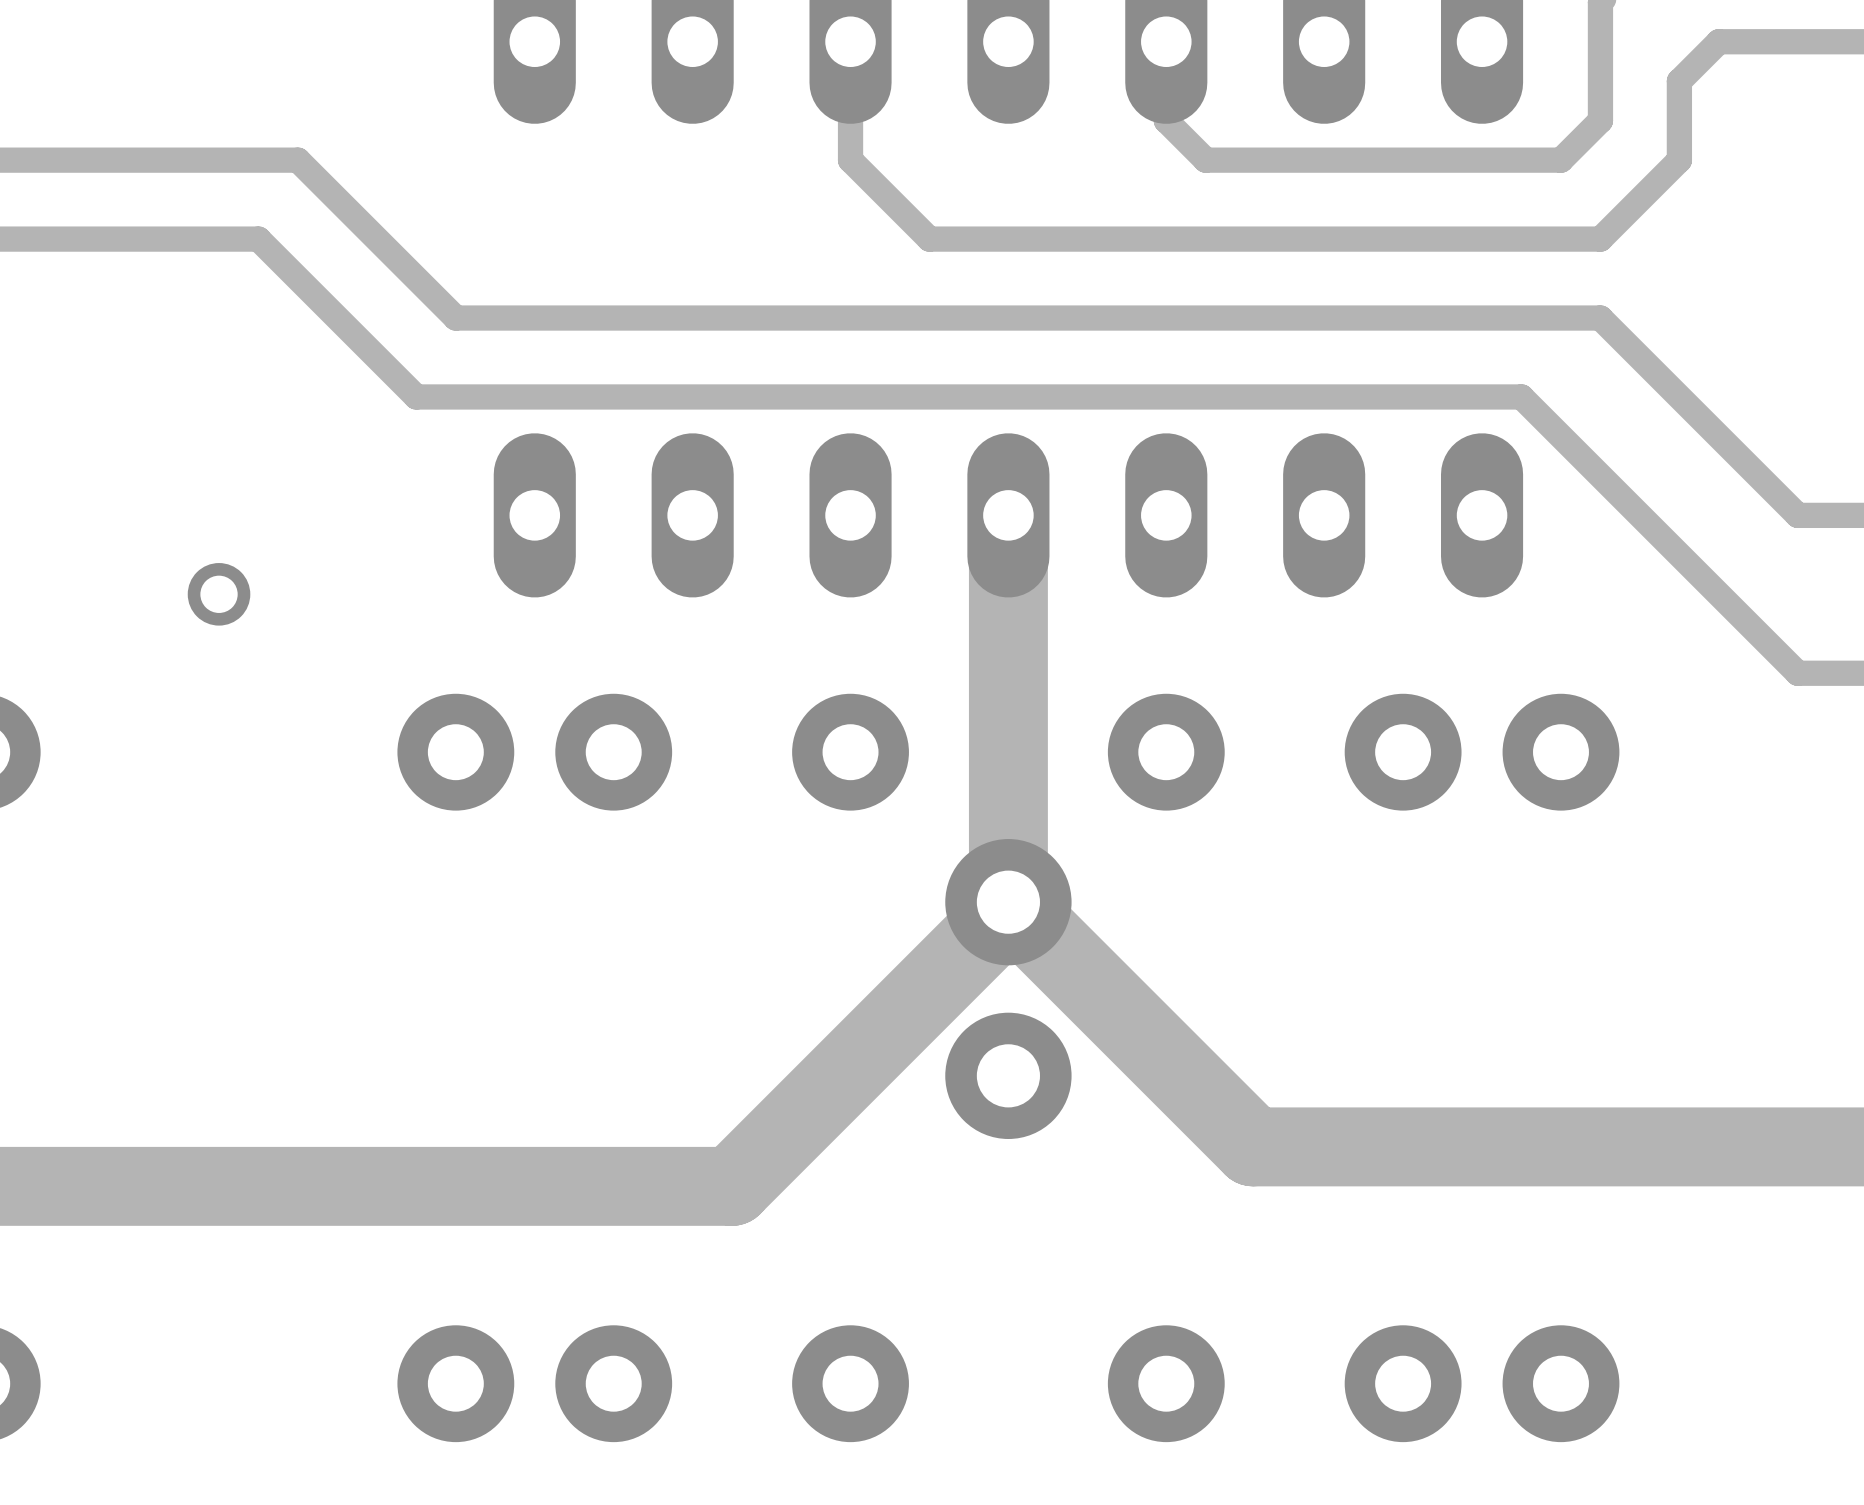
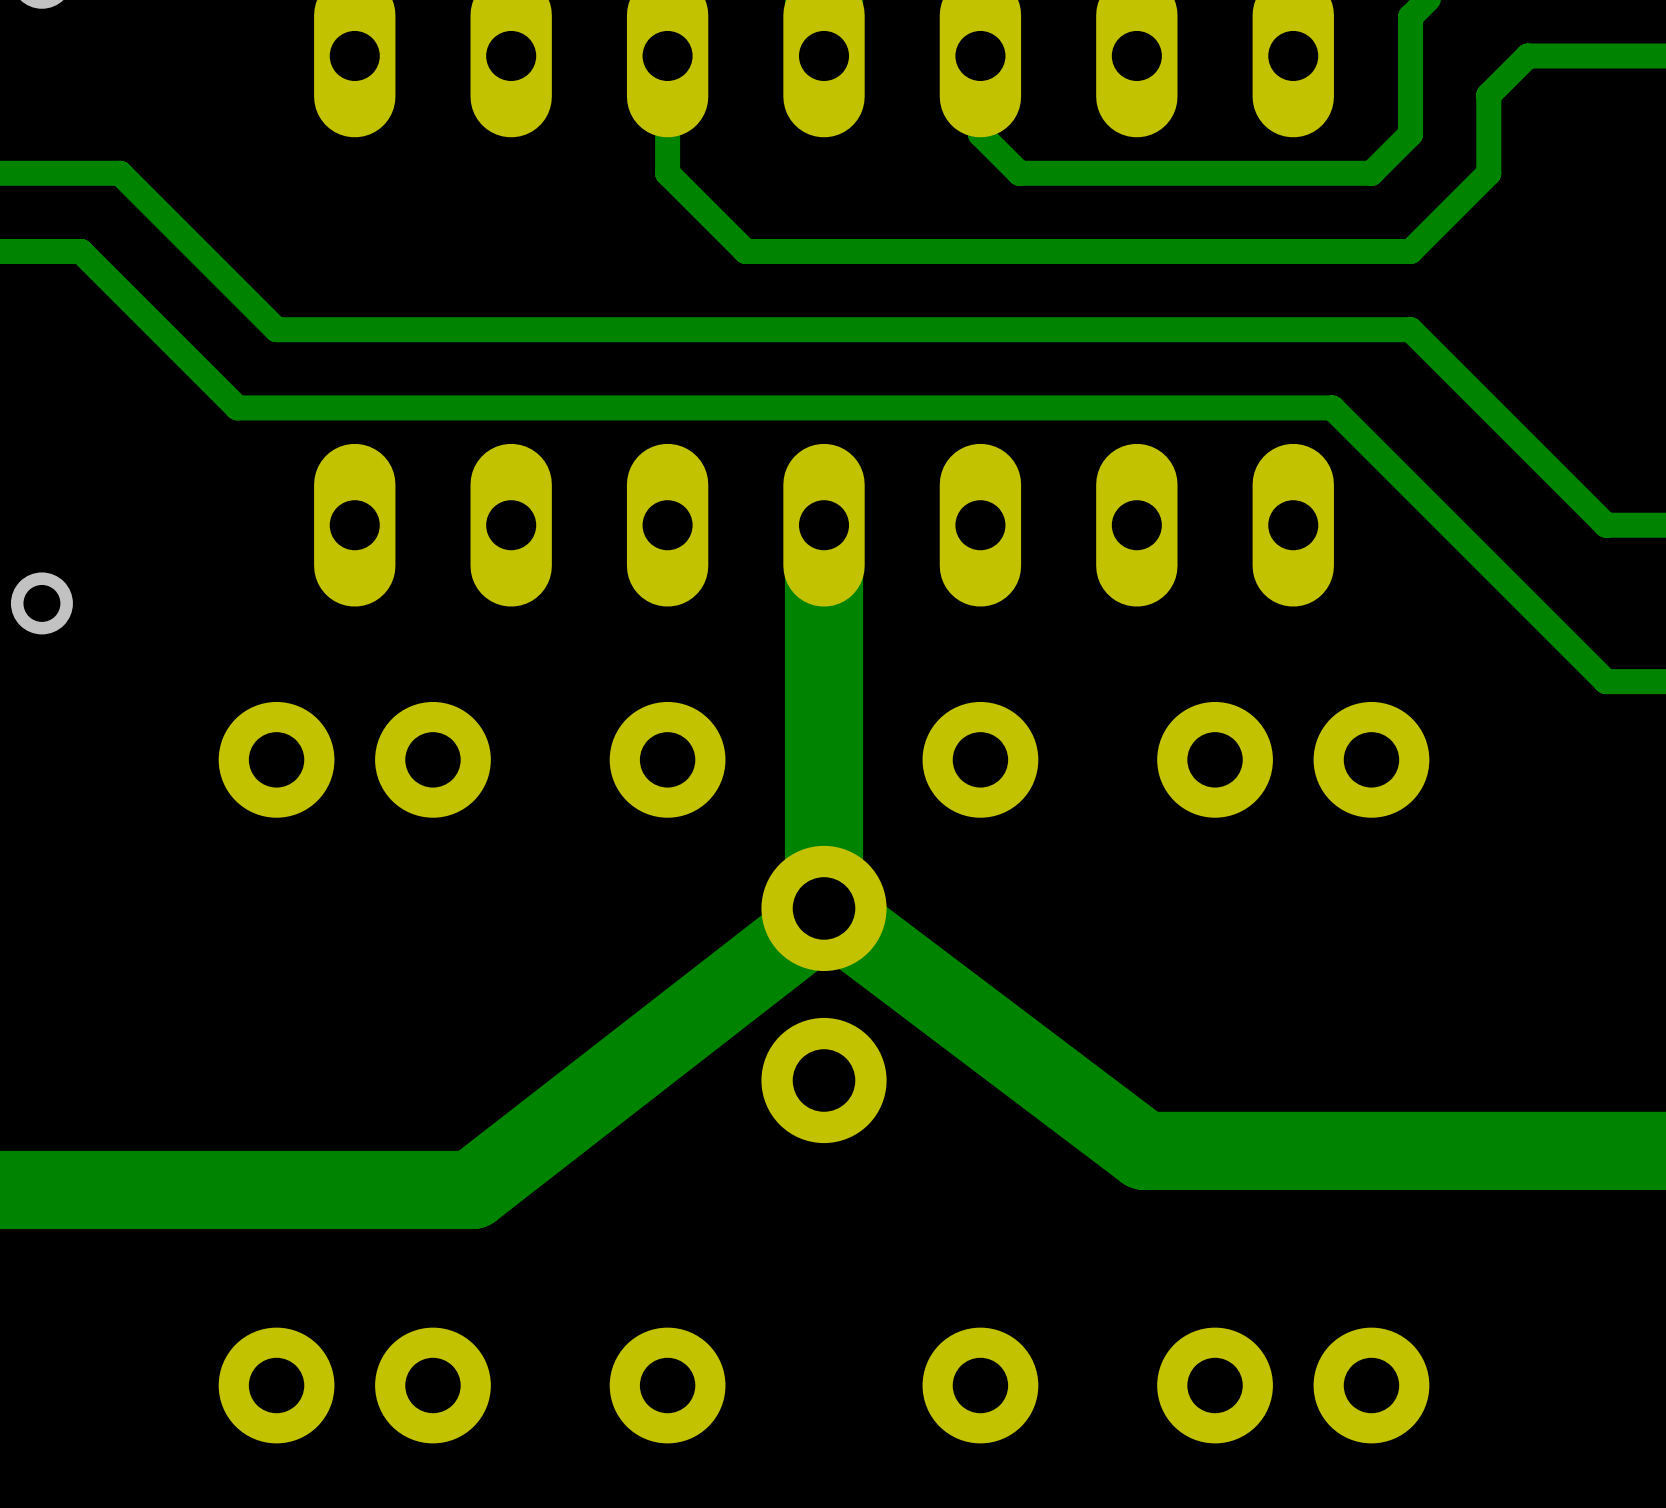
track: (1008, 515) (1008, 902) (1253, 1146) (1332, 1146) -> (824, 908) (1144, 1150)
track: (1008, 910) (732, 1186) (653, 1186) -> (824, 916) (472, 1189)

